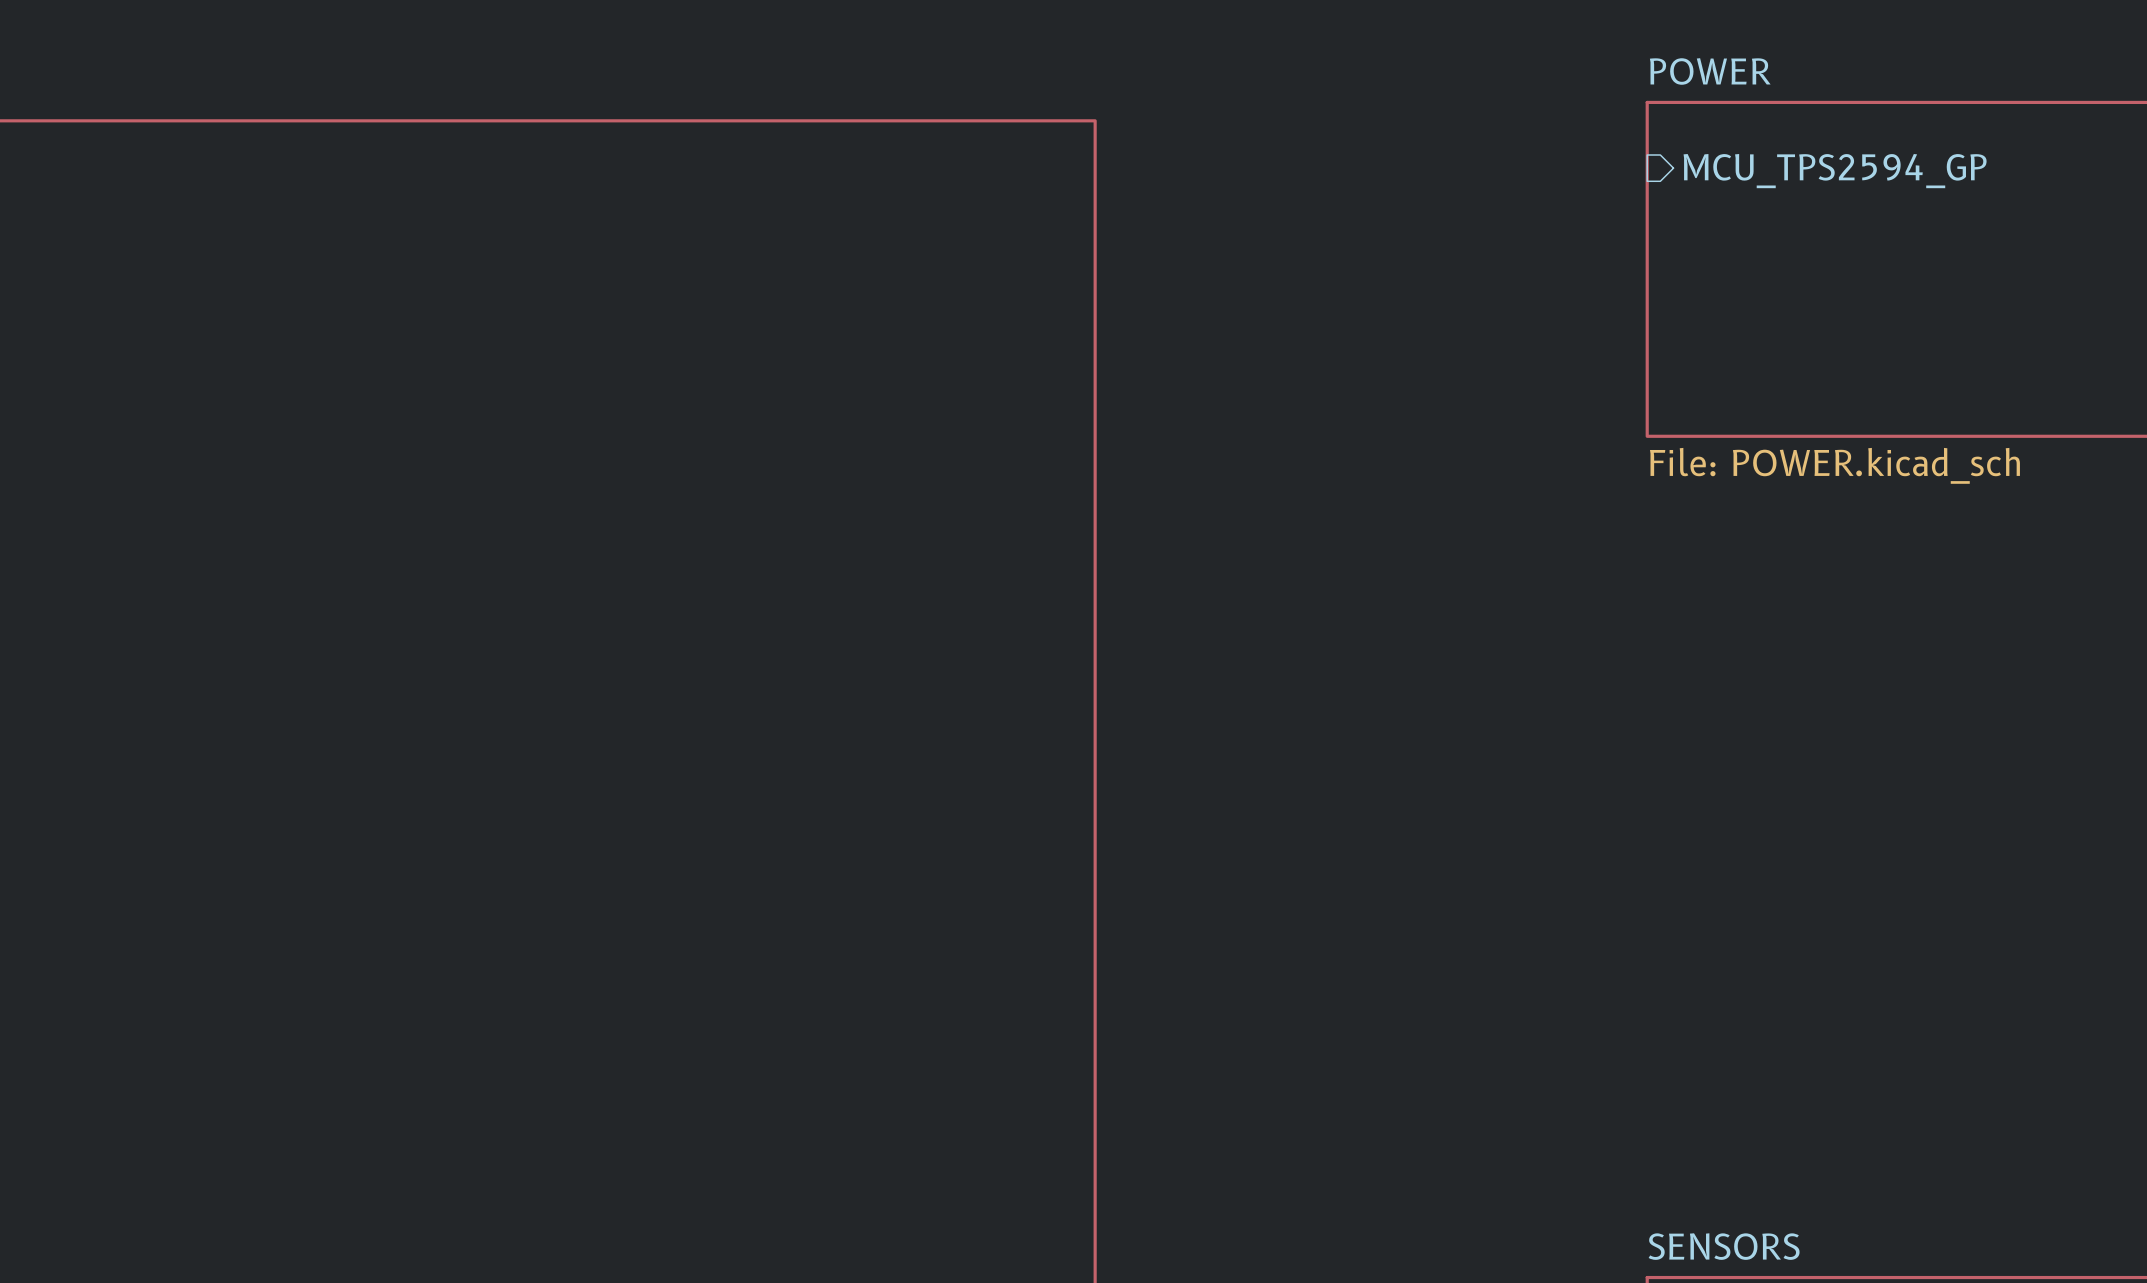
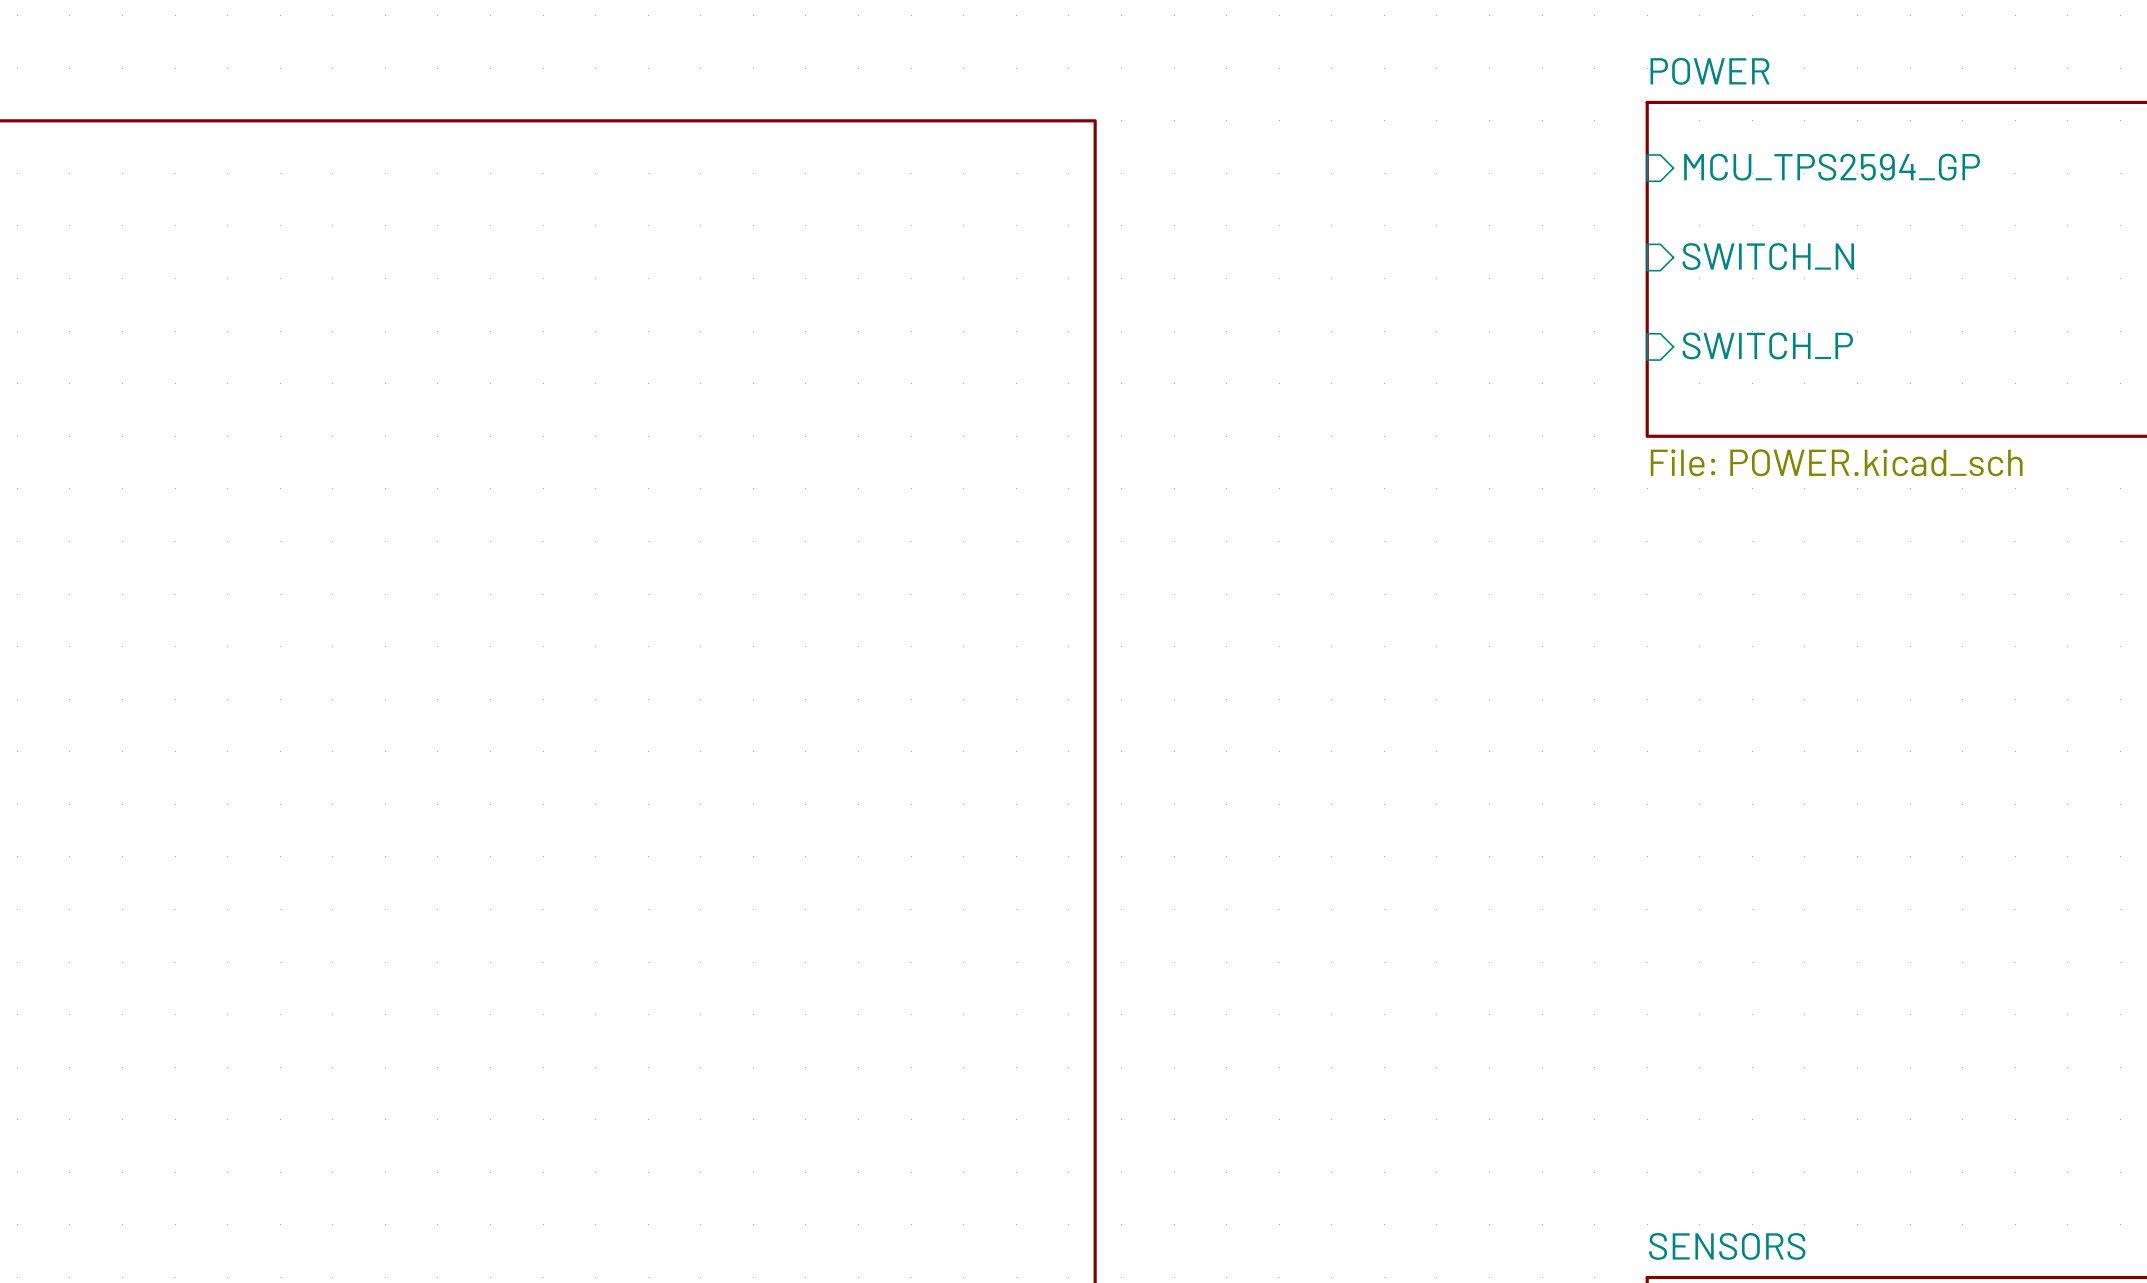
sheet pin: none -> SWITCH_N (1768, 256)
sheet pin: none -> SWITCH_P (1767, 345)

